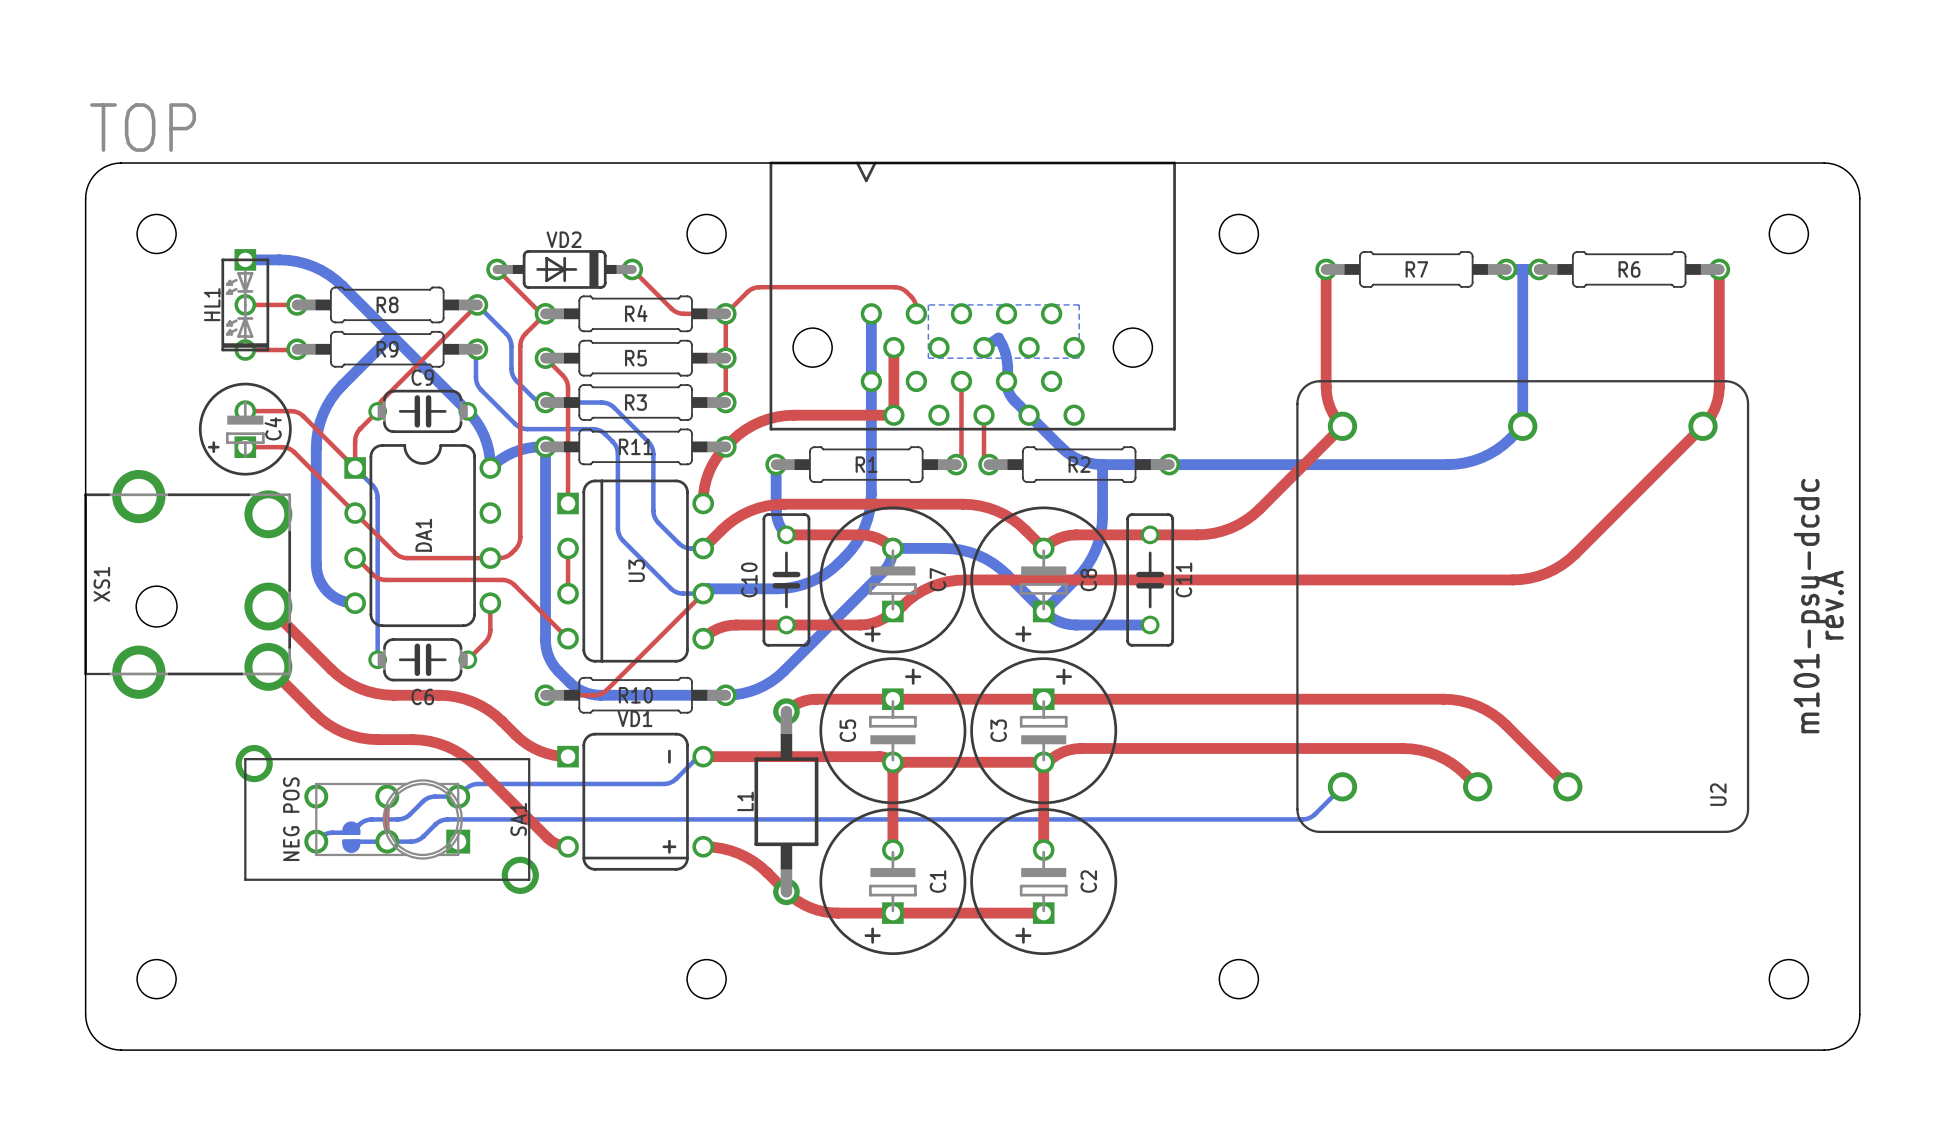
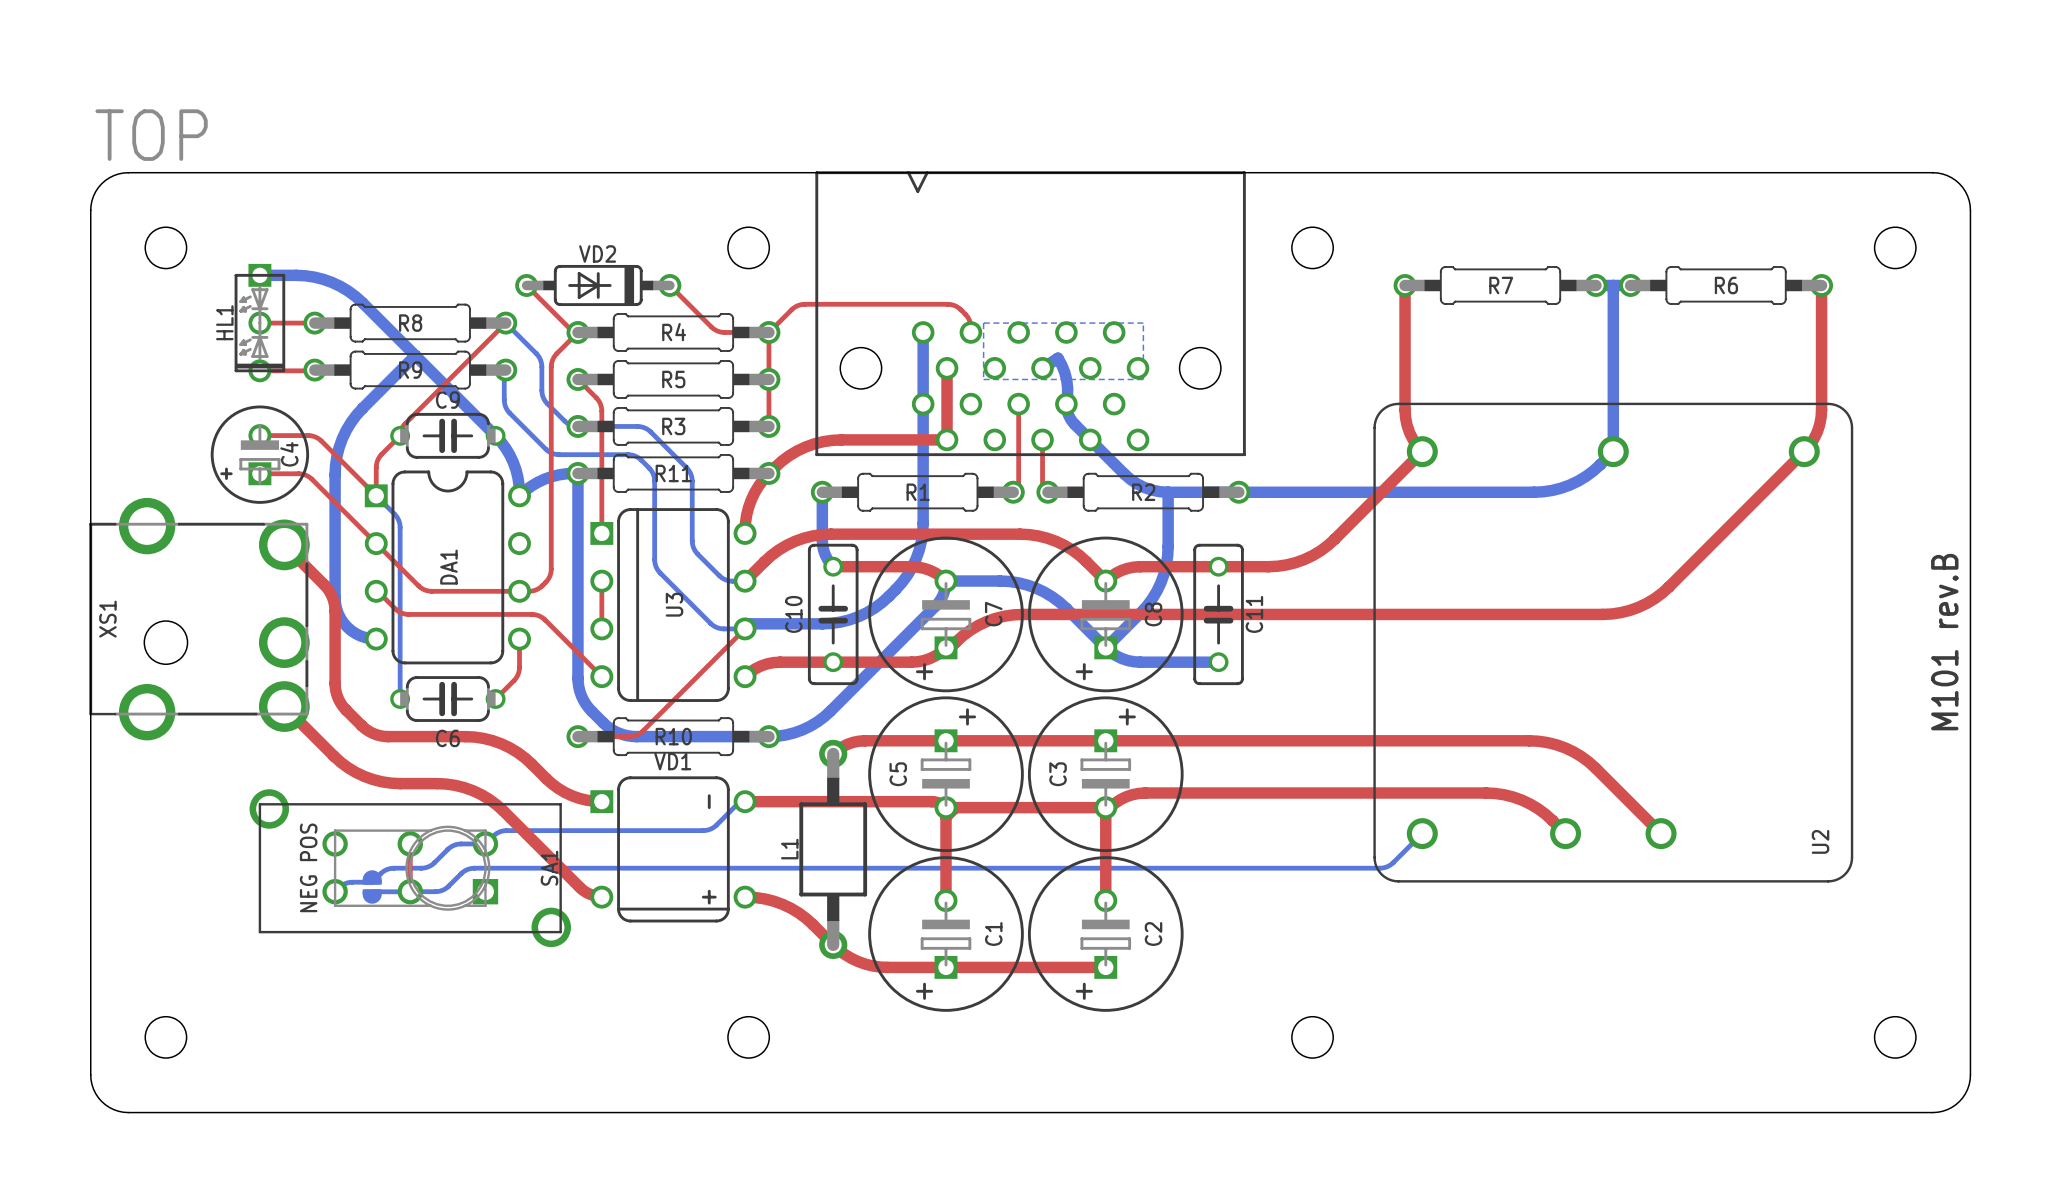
part value: rev.A (1830, 605) -> M101 rev.B (1944, 642)
top track: (268, 606) (344, 680) (368, 691) (393, 695) -> (284, 544) (324, 584) (332, 596) (335, 611) (335, 687) (341, 704) (361, 725) (373, 733) (384, 736) (417, 736)
part text: m101-psu-dcdc (1810, 606) -> none

